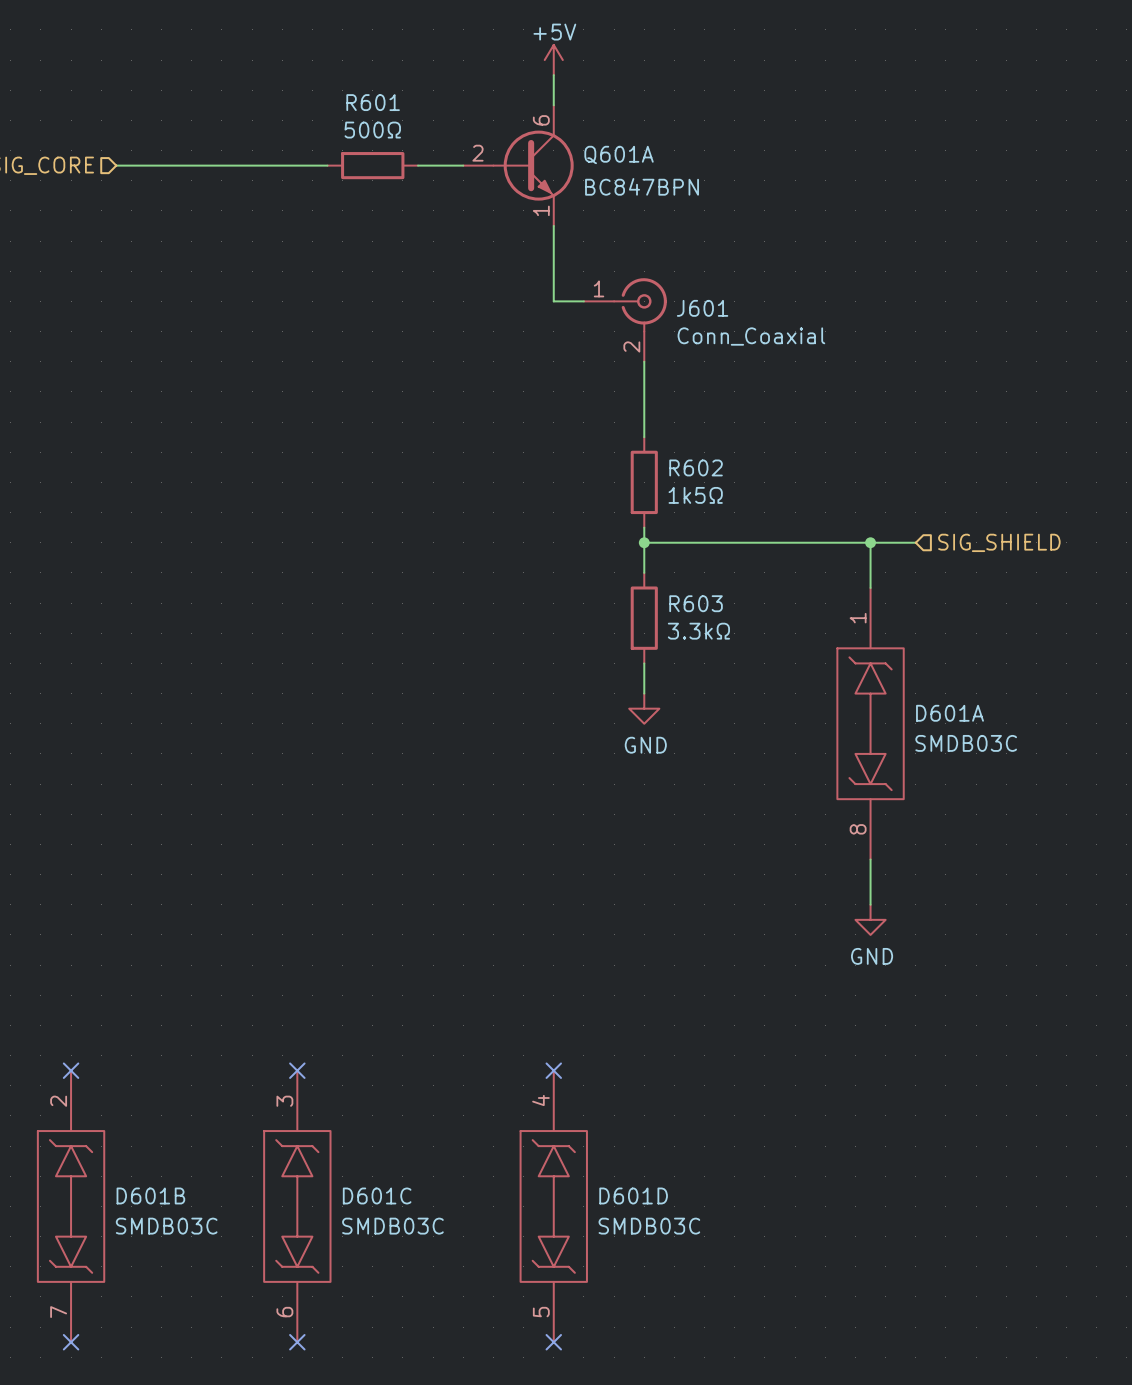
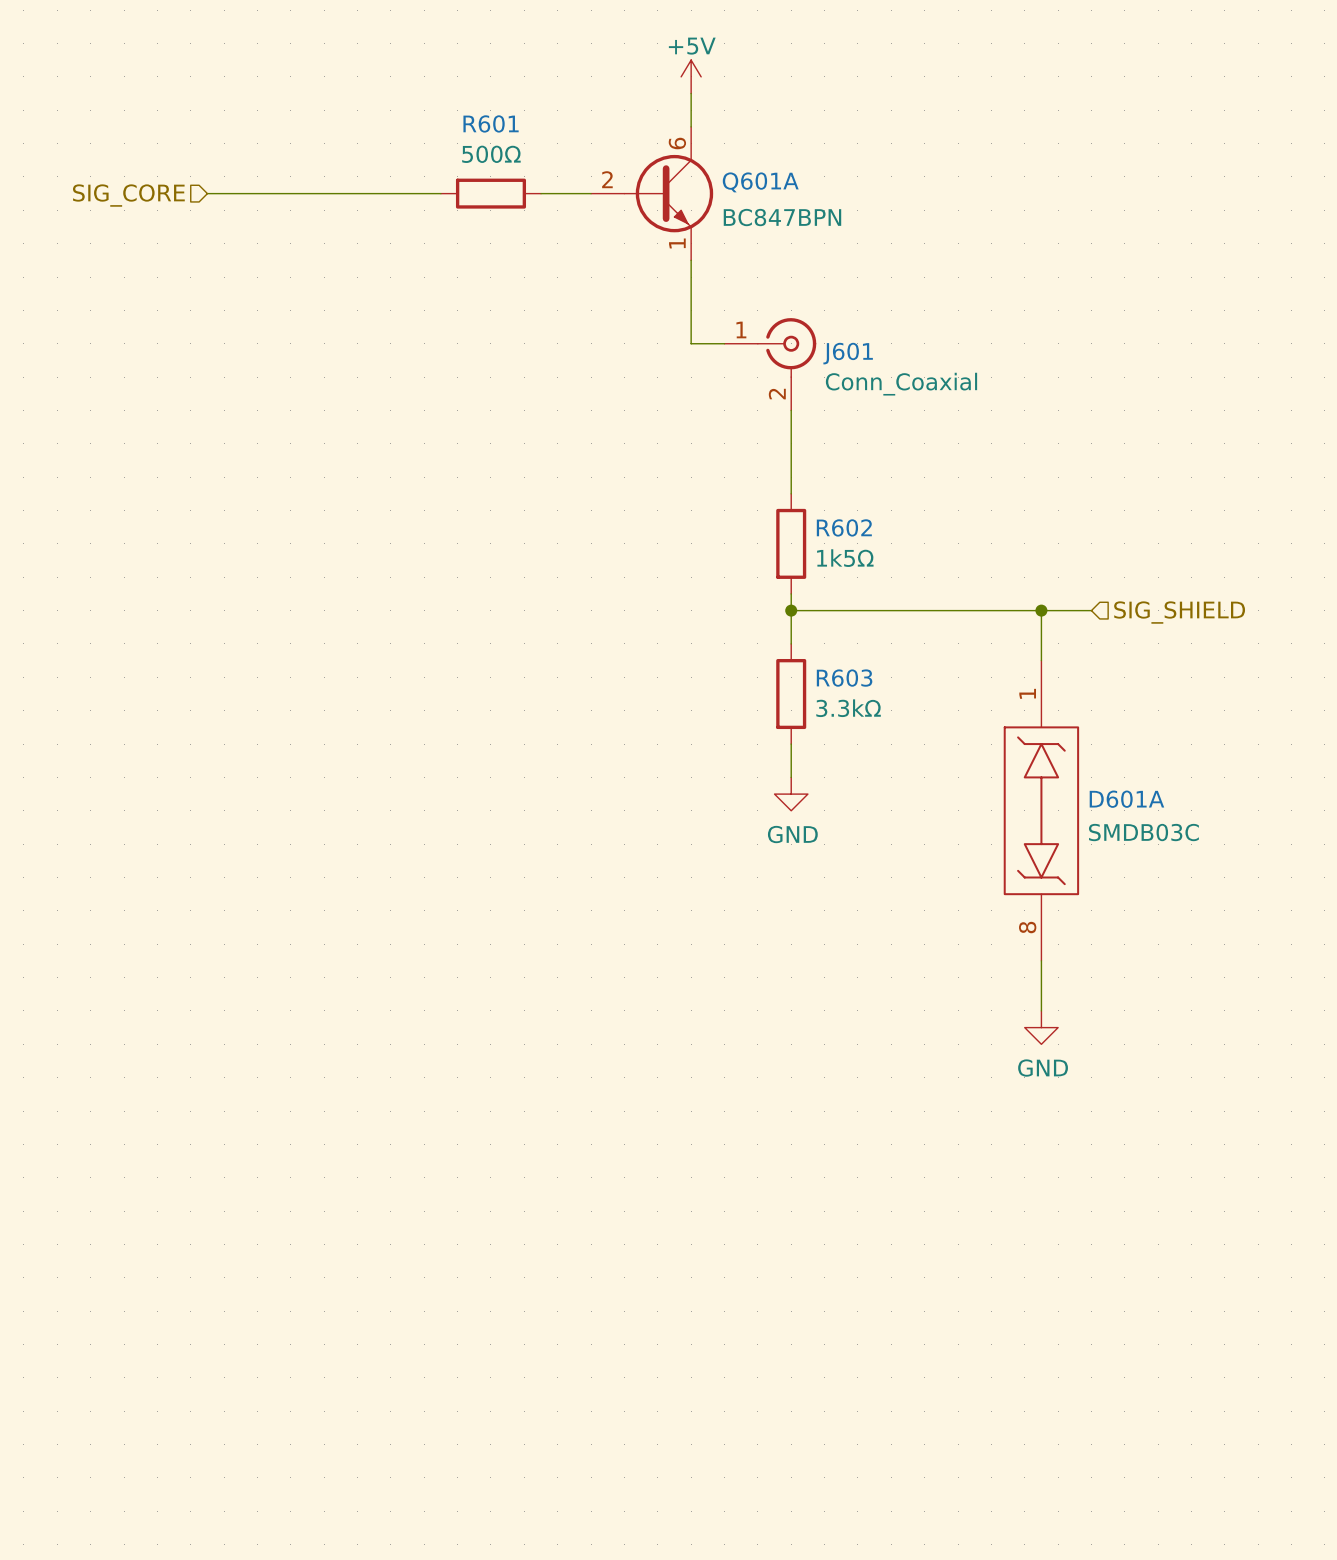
no-connect mark: (71, 1070) -> none
no-connect mark: (297, 1070) -> none
no-connect mark: (553, 1070) -> none
D601B: SMDB03C (71, 1206) -> none
D601C: SMDB03C (297, 1206) -> none
D601D: SMDB03C (553, 1206) -> none
no-connect mark: (71, 1342) -> none
no-connect mark: (297, 1342) -> none
no-connect mark: (553, 1342) -> none

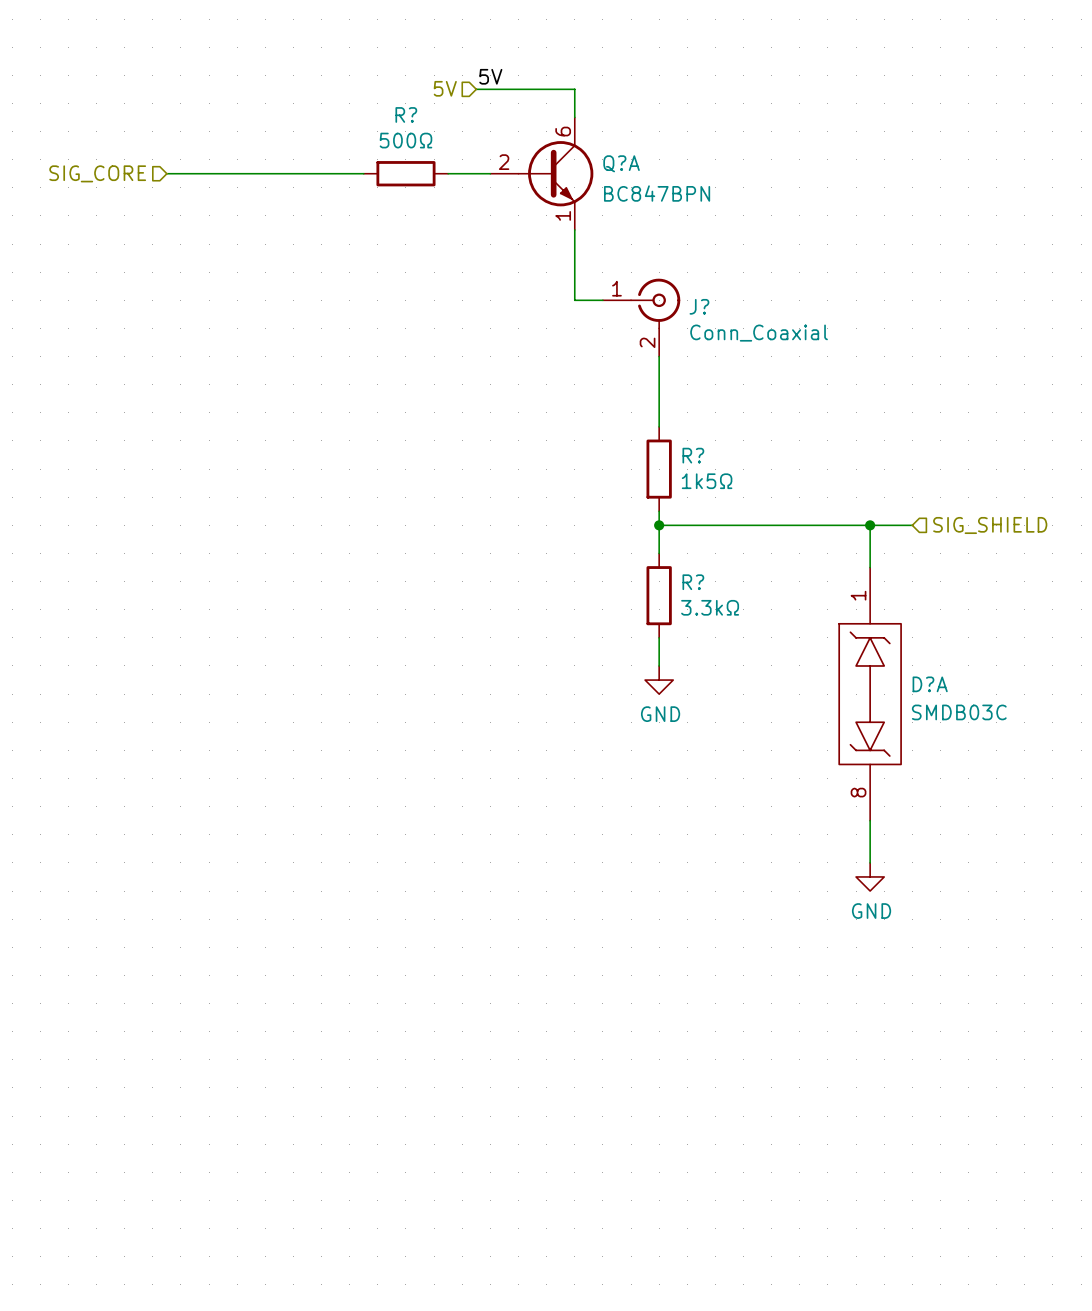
power symbol: +5V (691, 76) -> none
label: none -> 5V (490, 76)
hierarchical label: none -> 5V (445, 88)
wire: none -> (476, 89) (574, 89)
R601 name: R601 (491, 123) -> R? (406, 114)
Q601A name: Q601A (760, 182) -> Q?A (621, 163)
J601 name: J601 (848, 353) -> J? (699, 306)
R602 name: R602 (844, 527) -> R? (693, 455)
R603 name: R603 (844, 678) -> R? (693, 582)
D601A name: D601A (1126, 799) -> D?A (930, 684)

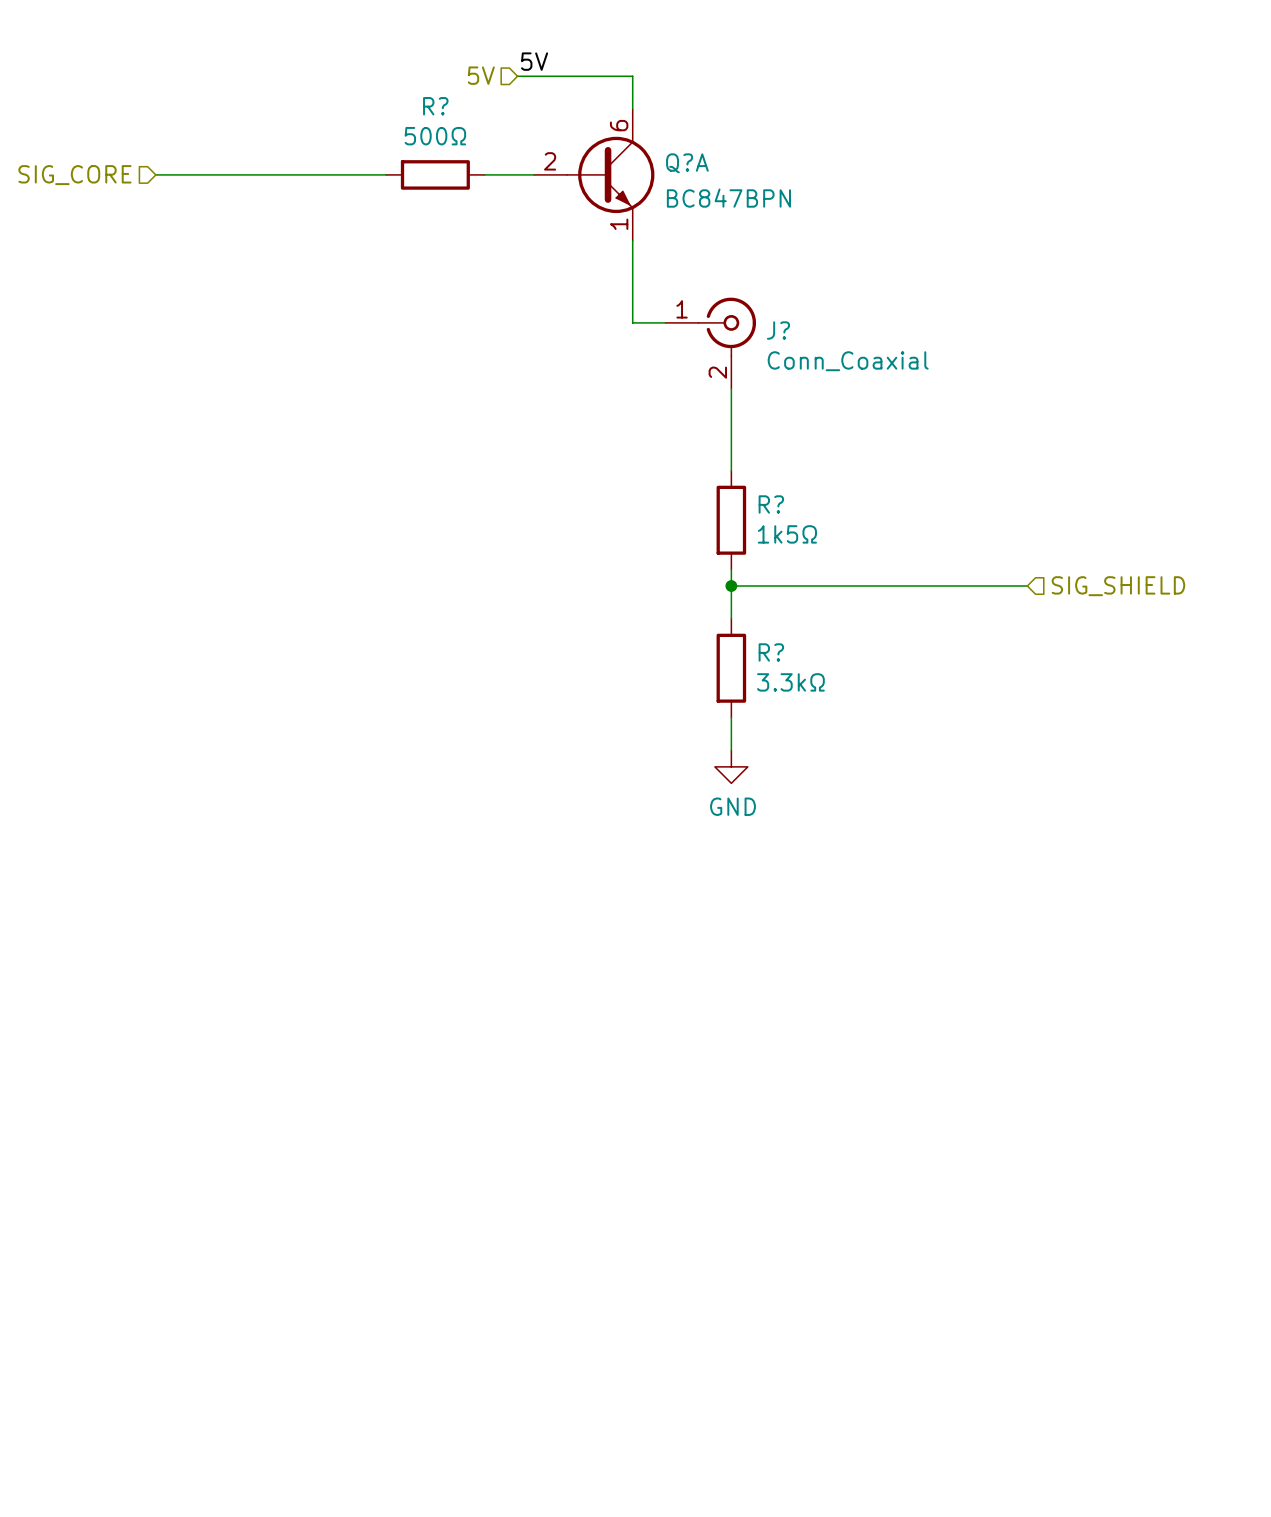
wire: (870, 525) (870, 567) -> none
junction: (870, 525) -> none
D?A: SMDB03C (870, 694) -> none
wire: (870, 820) (870, 862) -> none
power symbol: GND (870, 876) -> none

